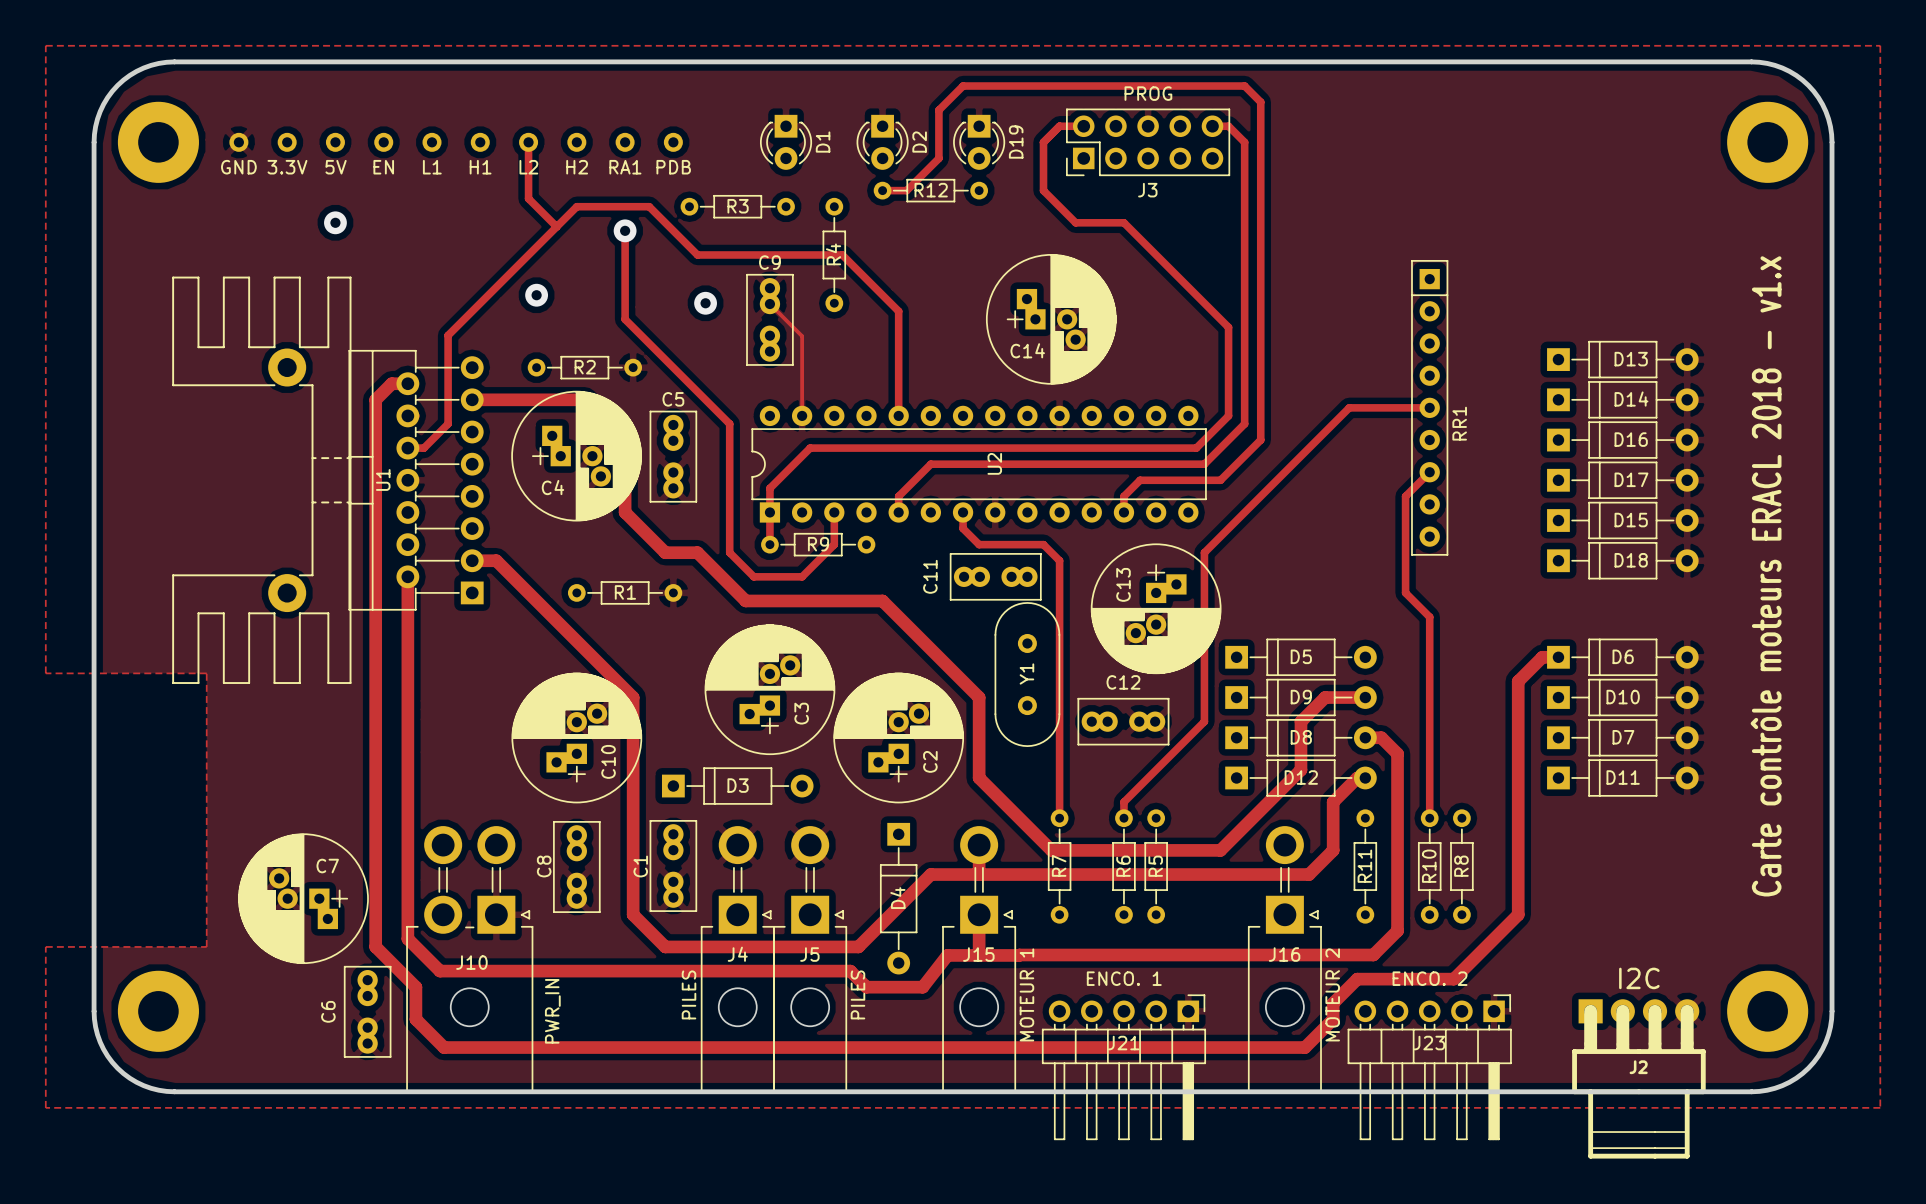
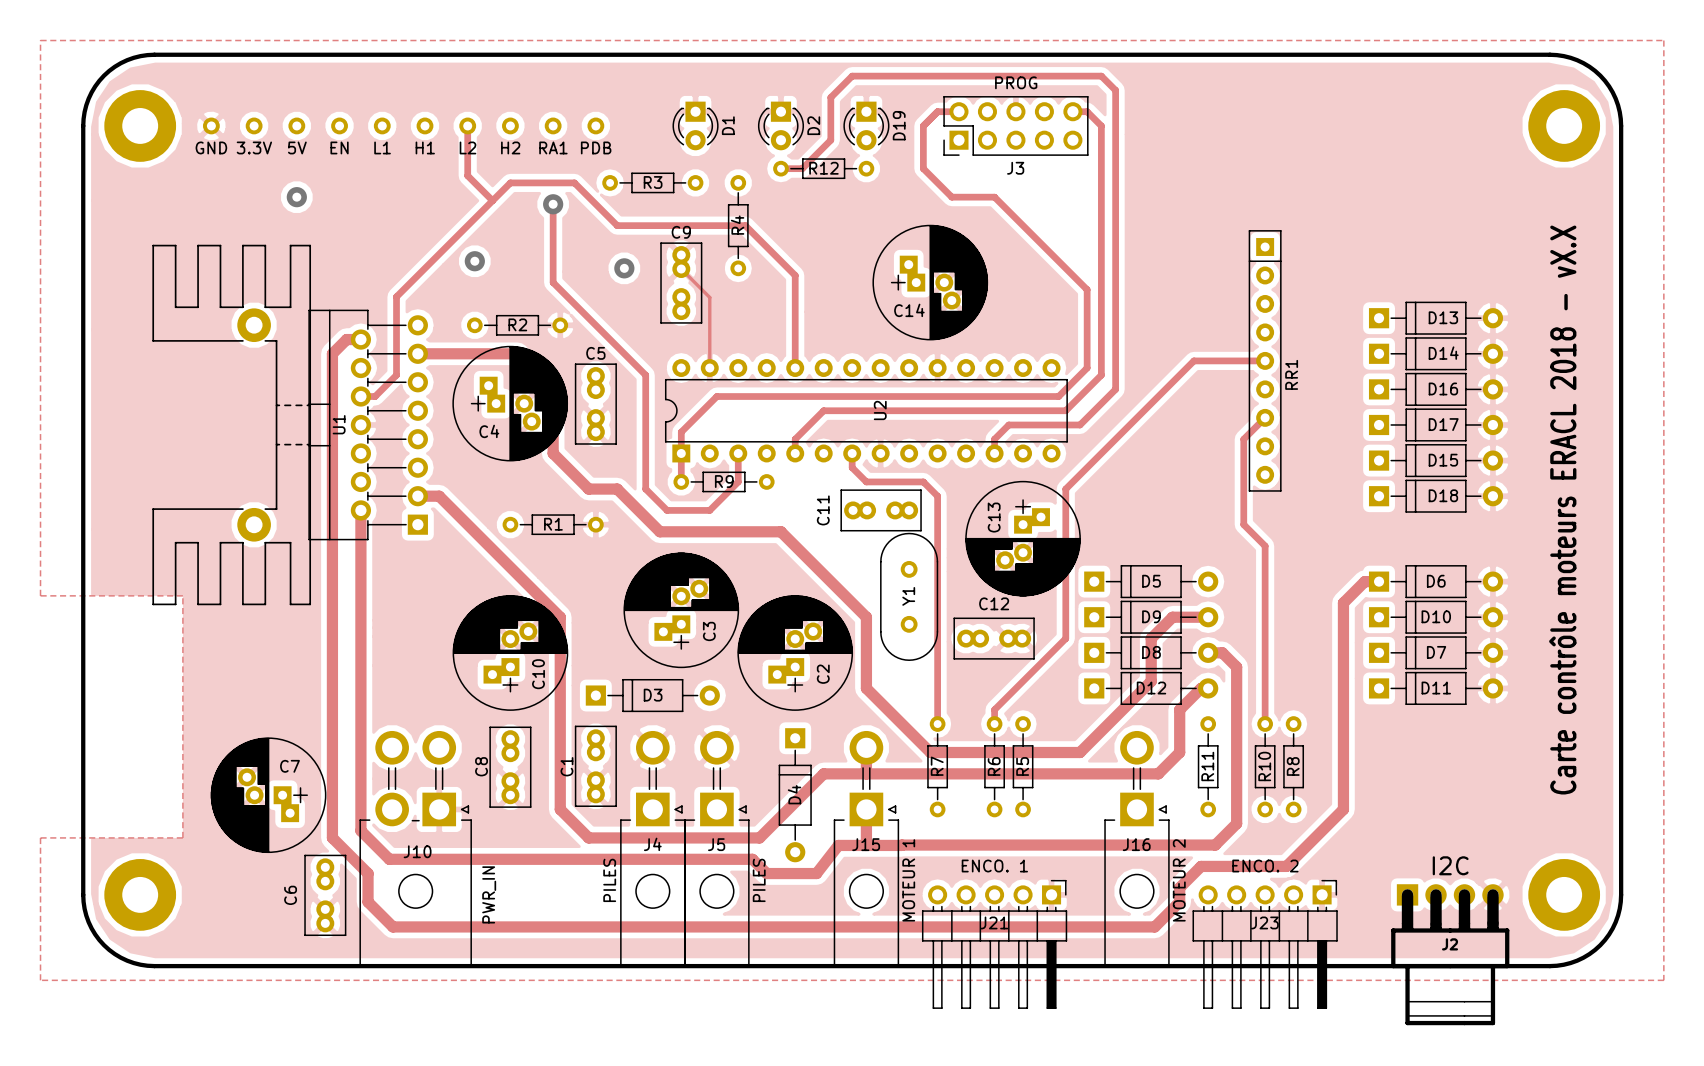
text: Carte contrôle moteurs ERACL 2018 - v1.x (1766, 576) -> Carte contrôle moteurs ERACL 2018 - vX.X (1562, 510)

